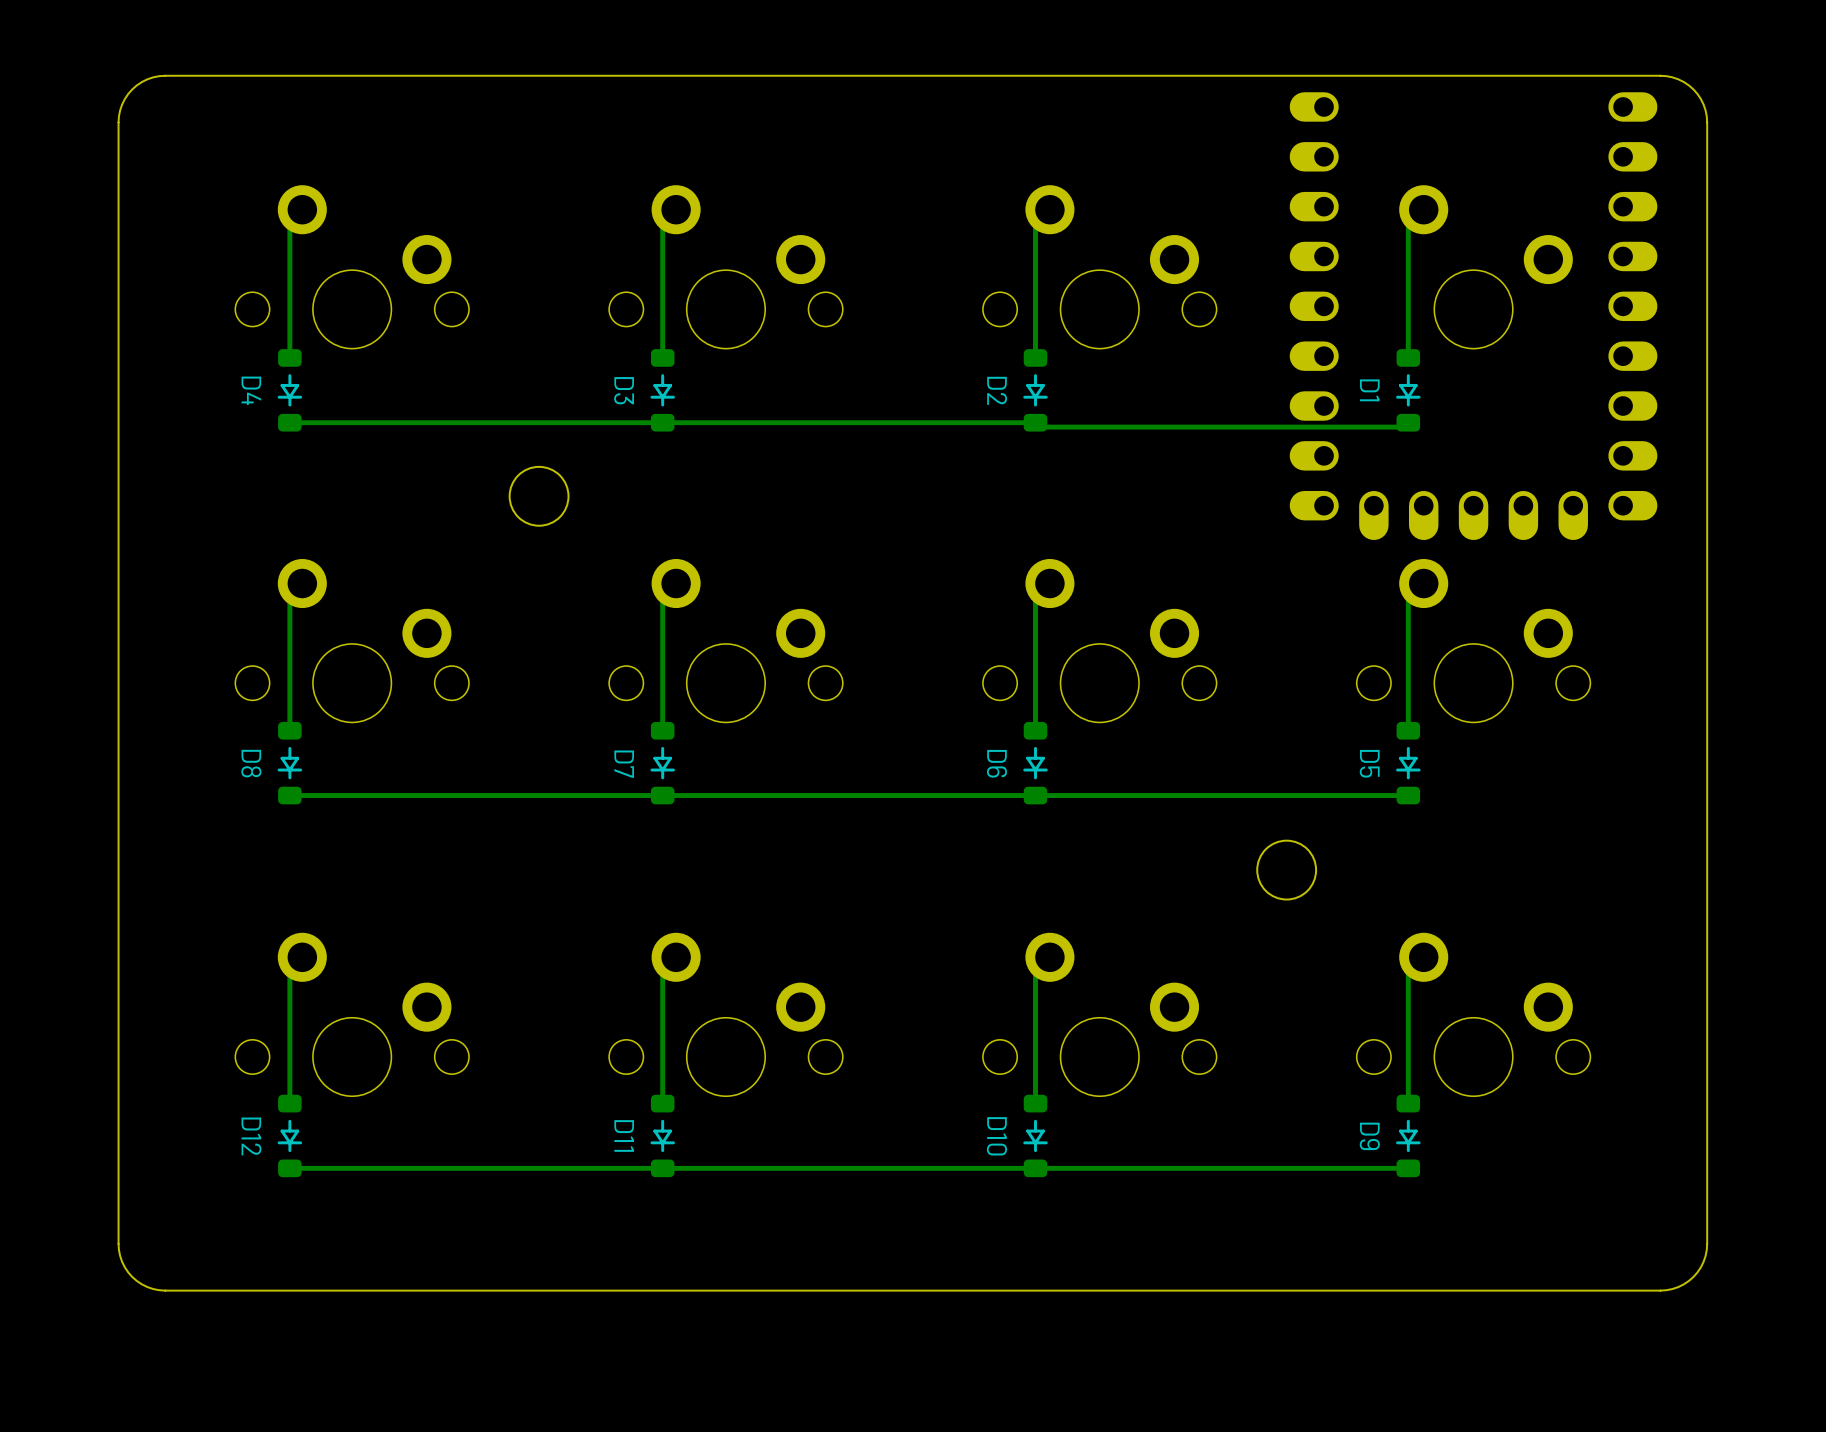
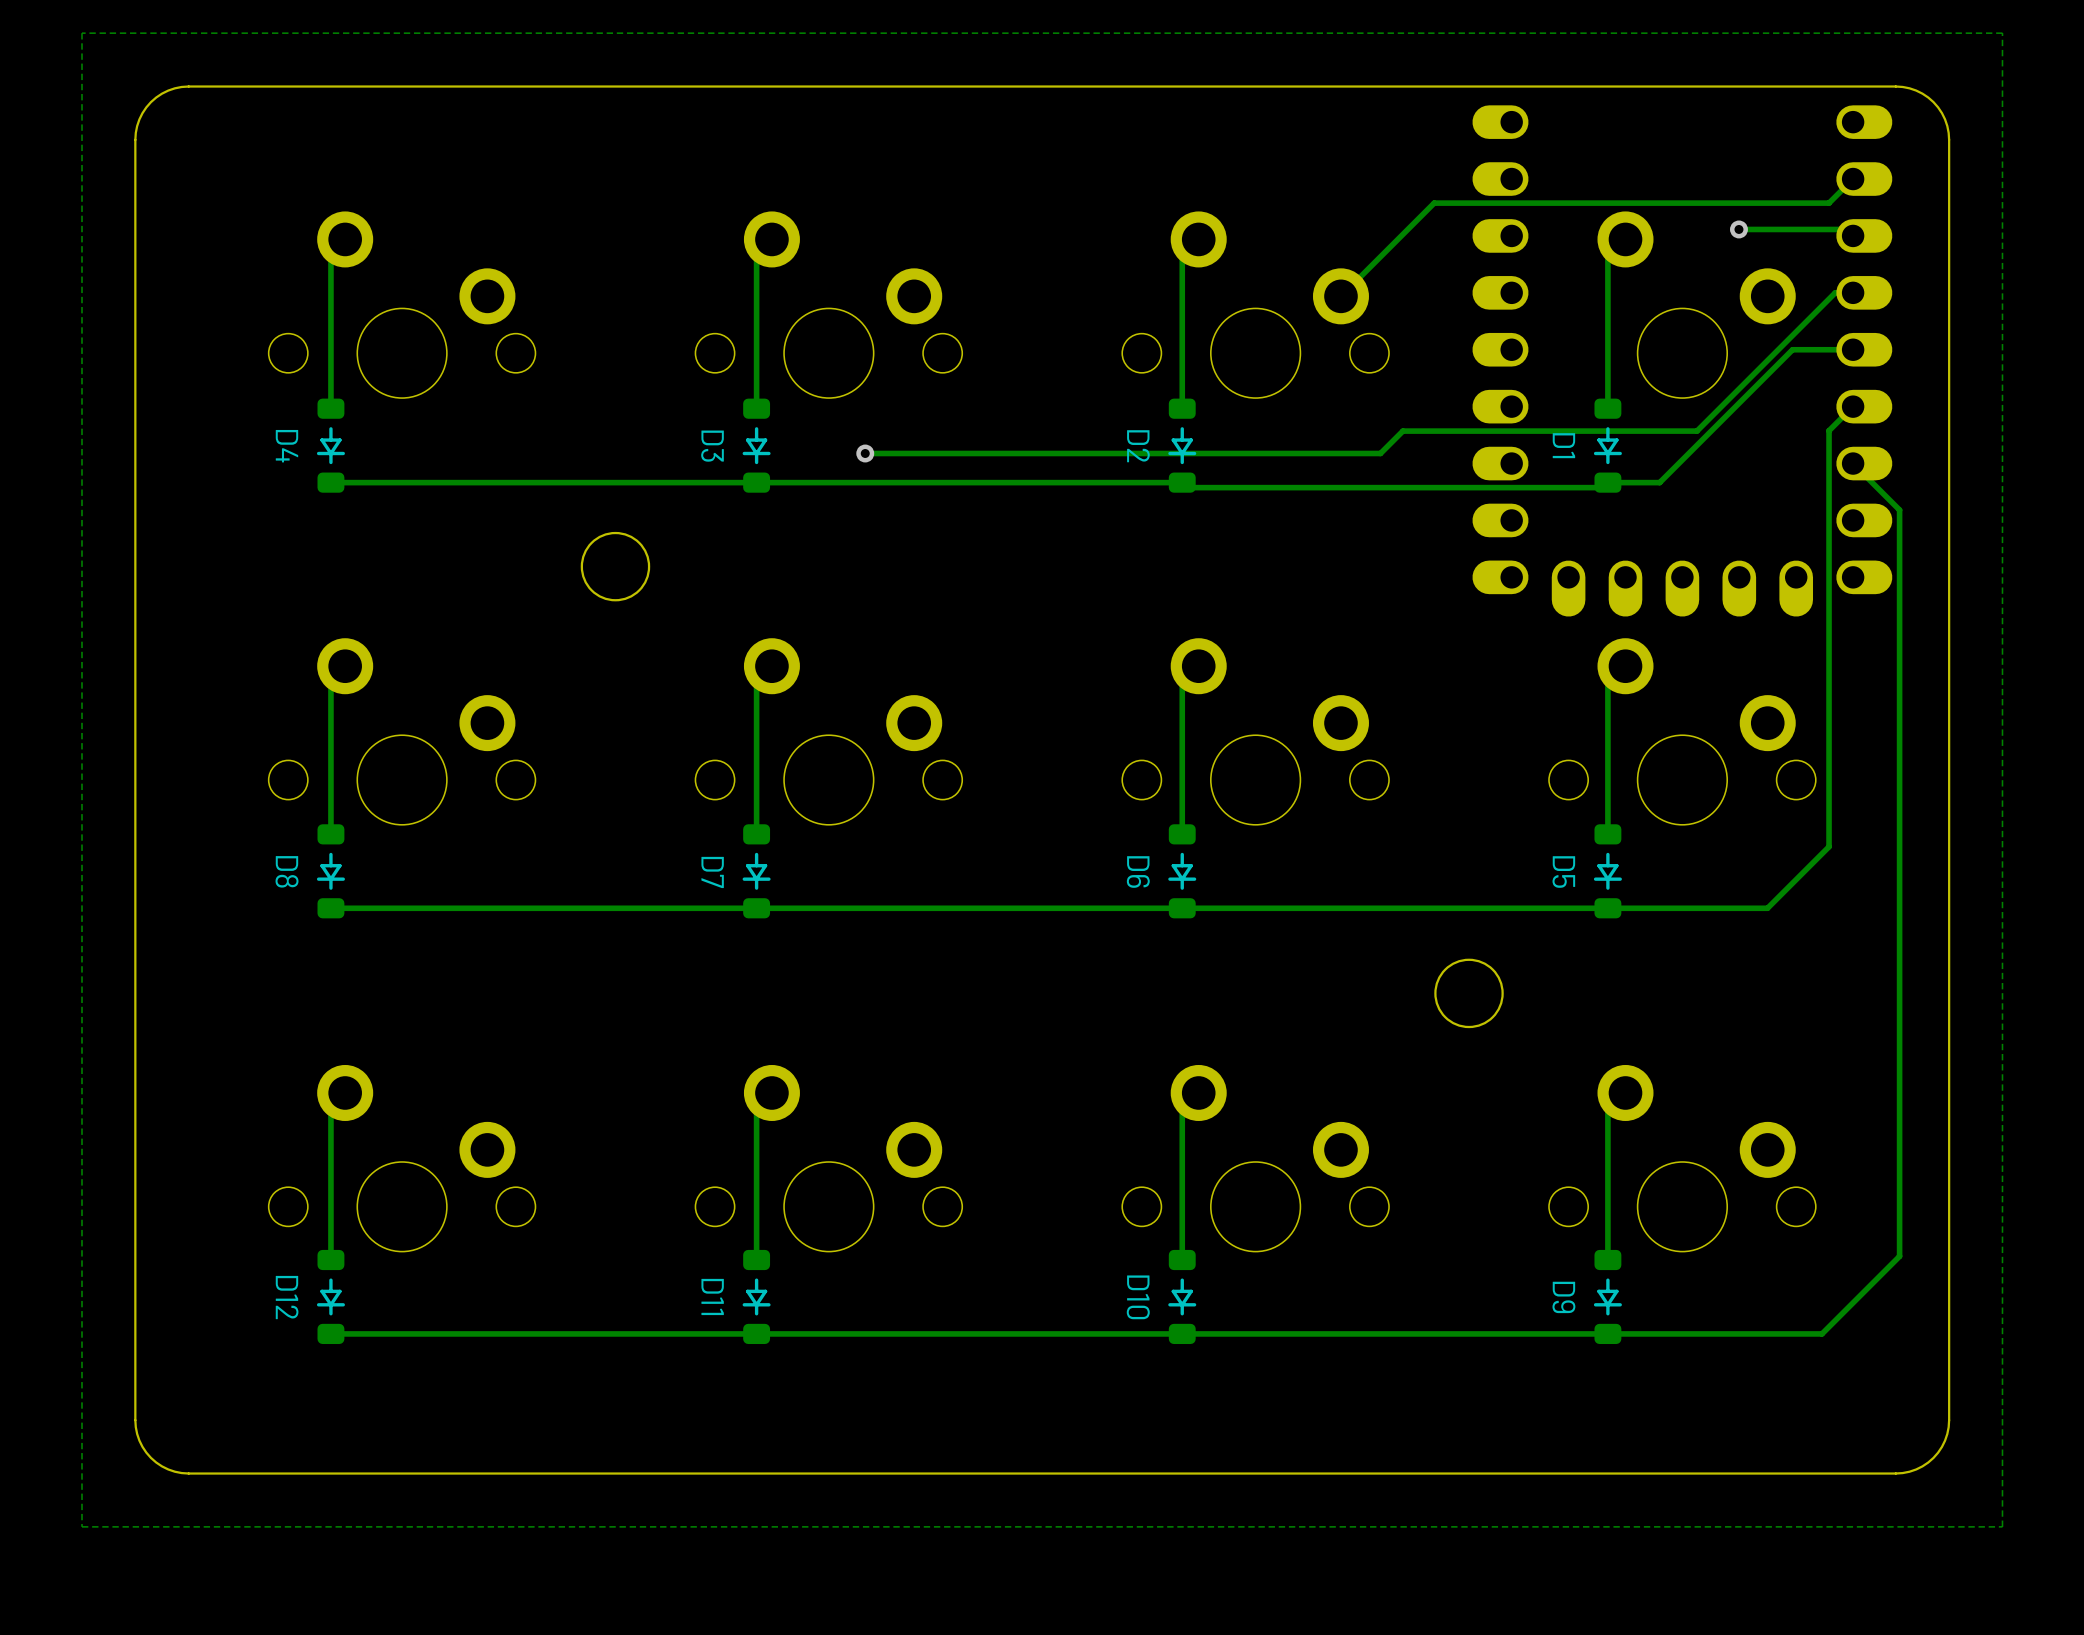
zone outline: none -> (2002, 33) (81, 33) (81, 1526) (2002, 1526) (2002, 33)
track: none -> (1853, 179) (1829, 203) (1434, 203) (1340, 296)
track: none -> (1738, 229) (1846, 229) (1853, 235)
via: none -> (1738, 229)
track: none -> (1853, 292) (1835, 292) (1696, 431) (1402, 431) (1380, 453) (865, 453)
track: none -> (1853, 349) (1792, 349) (1659, 482) (1607, 482)
track: none -> (1853, 406) (1829, 430) (1829, 846) (1767, 908) (1607, 908)
via: none -> (865, 453)
track: none -> (1853, 463) (1899, 510) (1899, 1256) (1822, 1333) (1607, 1333)

